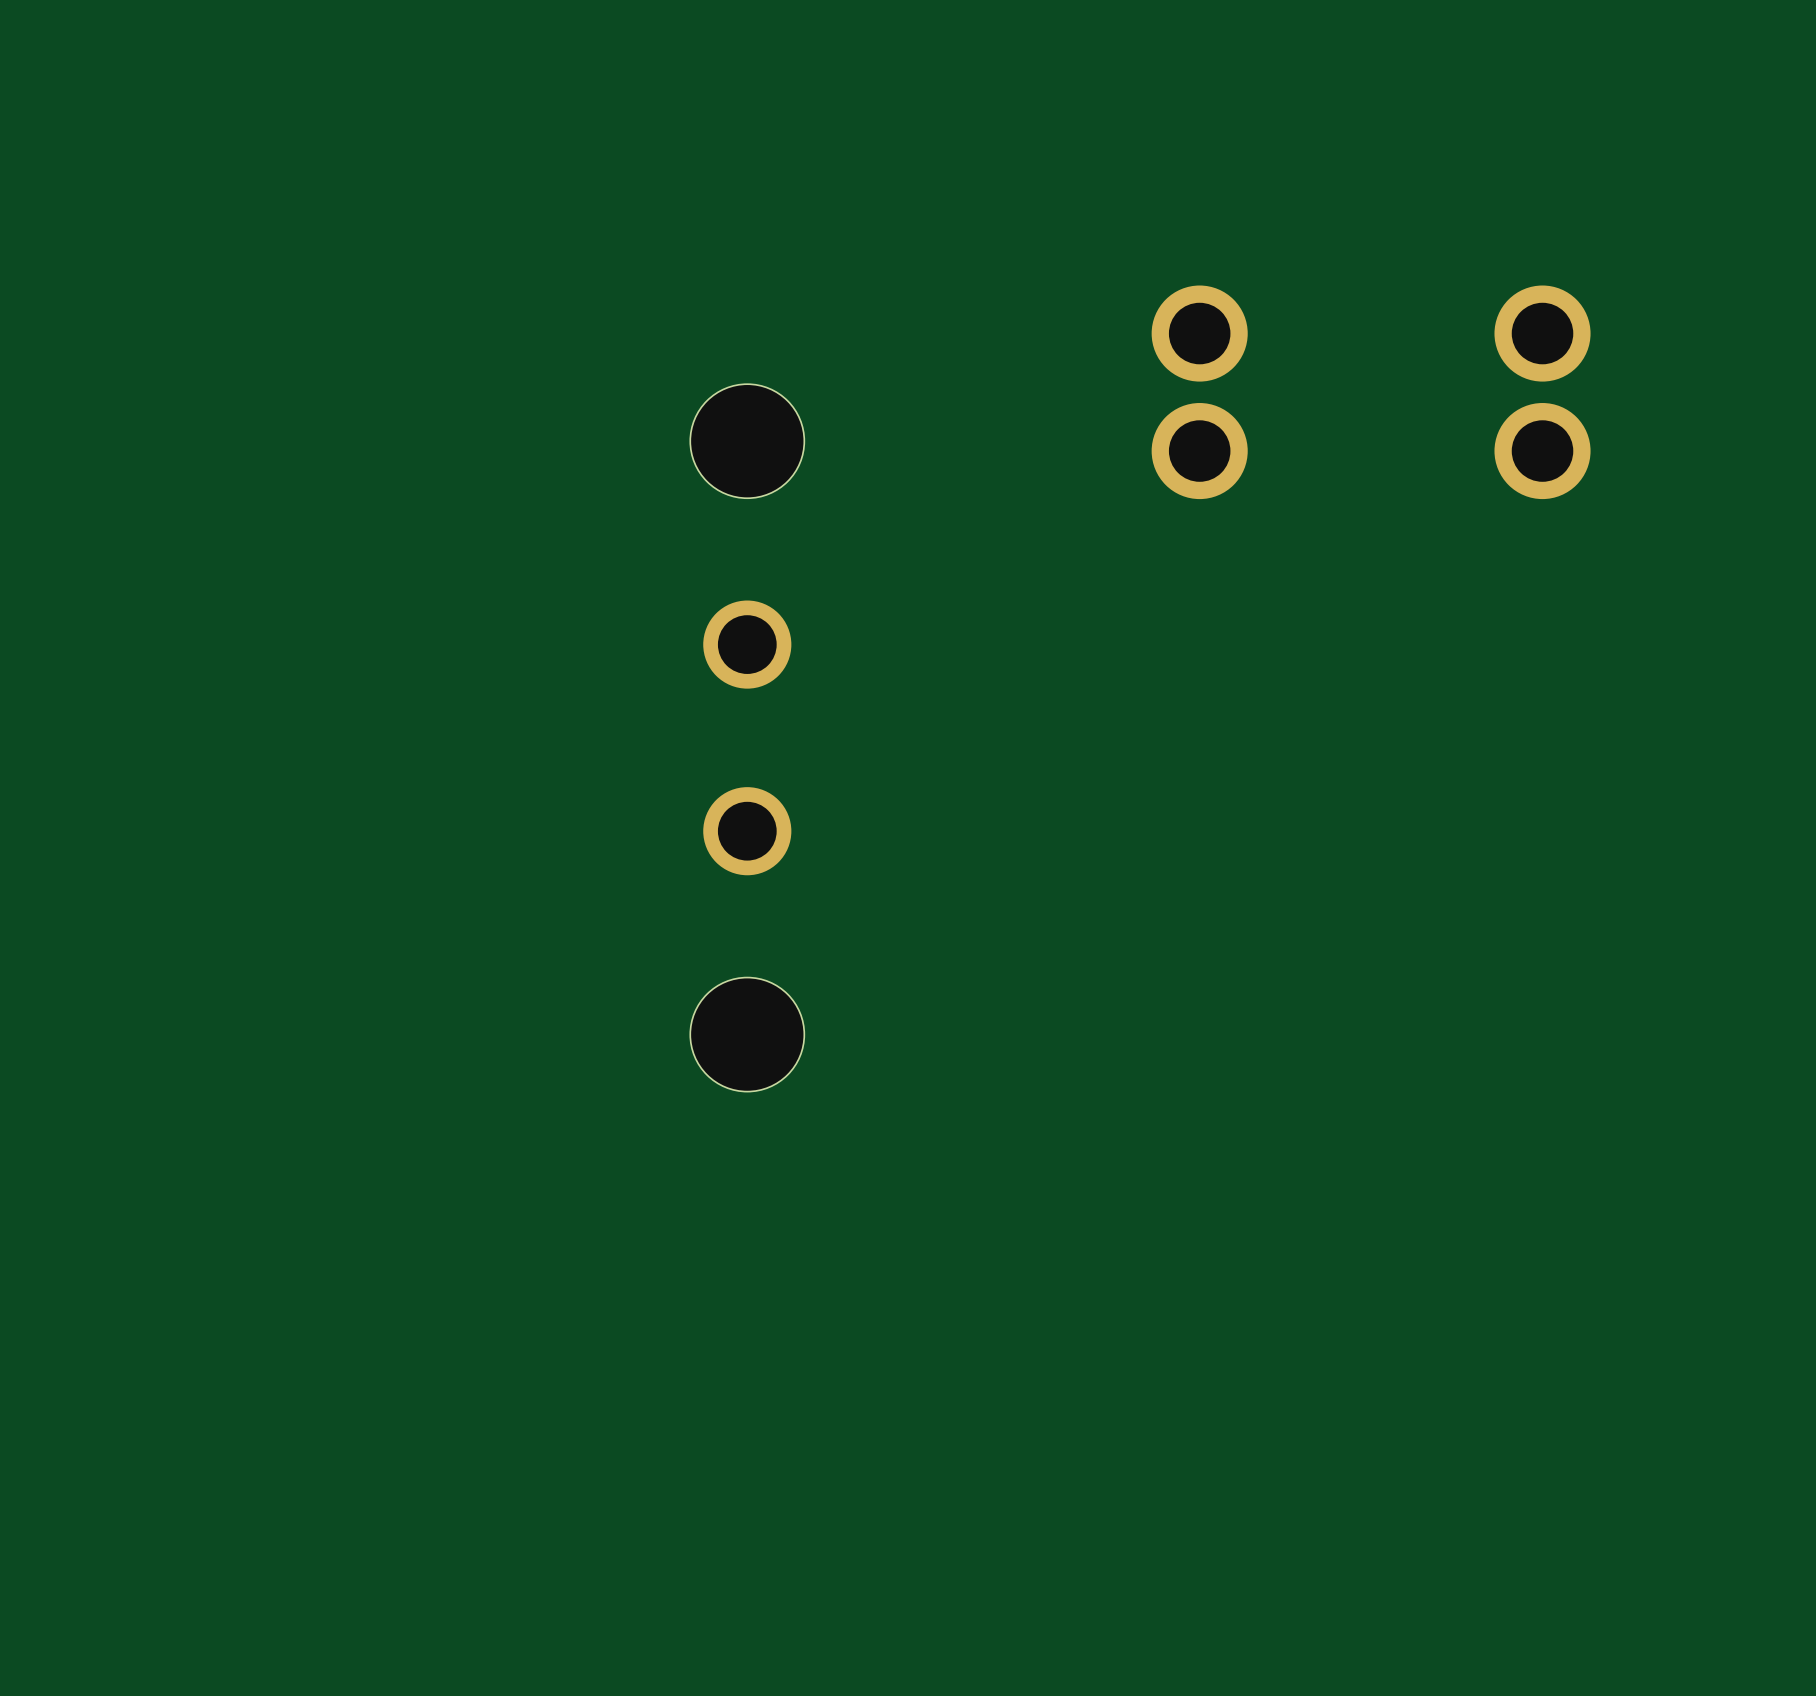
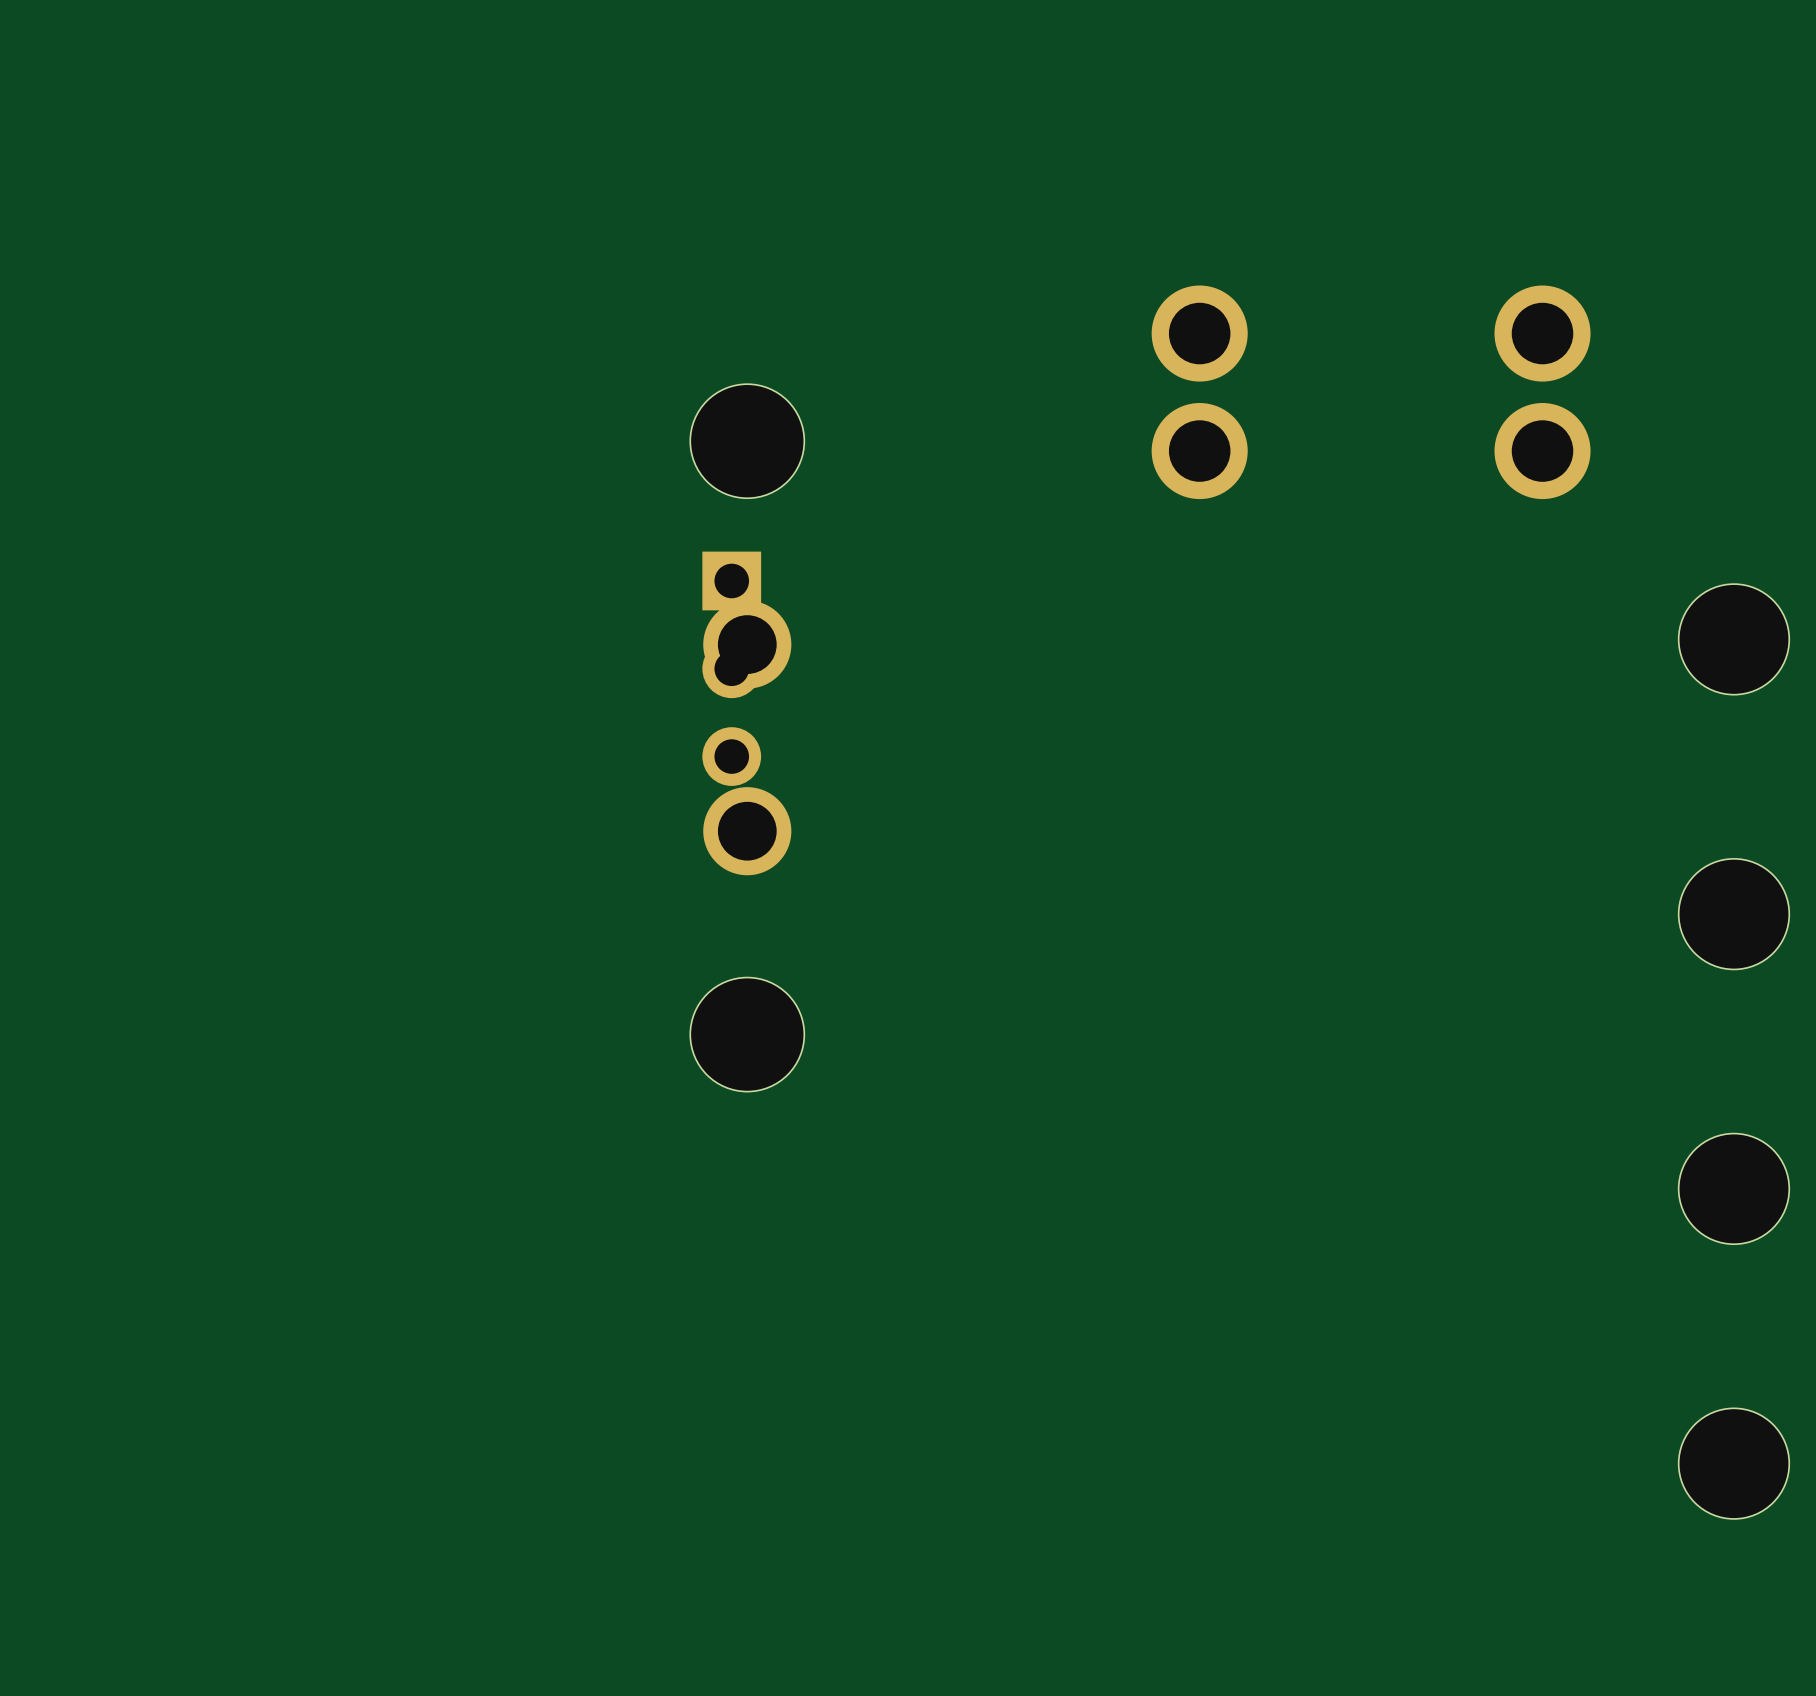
part: none -> (1733, 639)
part: none -> (731, 668)
part: none -> (1733, 914)
part: none -> (1733, 1188)
part: none -> (1733, 1463)

